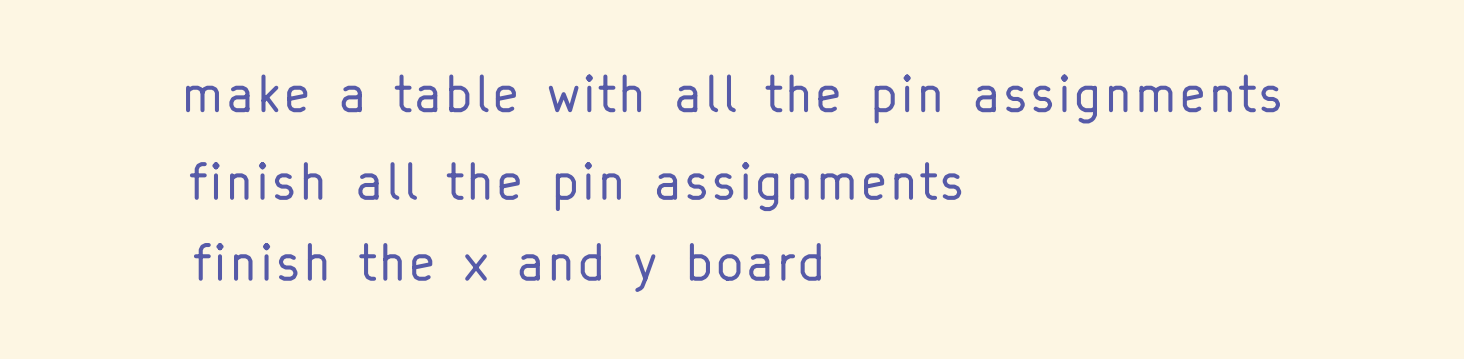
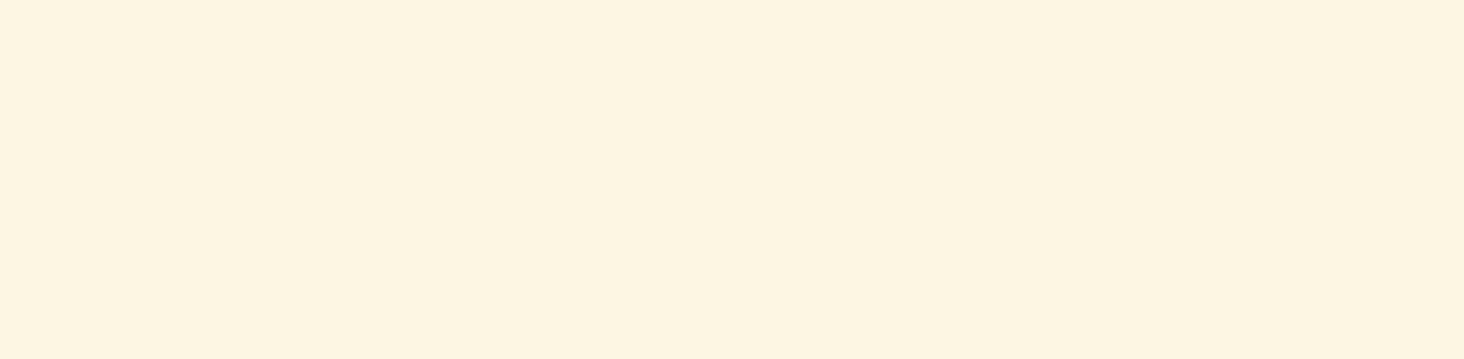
text: make a table with all the pin assignments (732, 98) -> none
text: finish all the pin assignments (575, 186) -> none
text: finish the x and y board (507, 267) -> none

